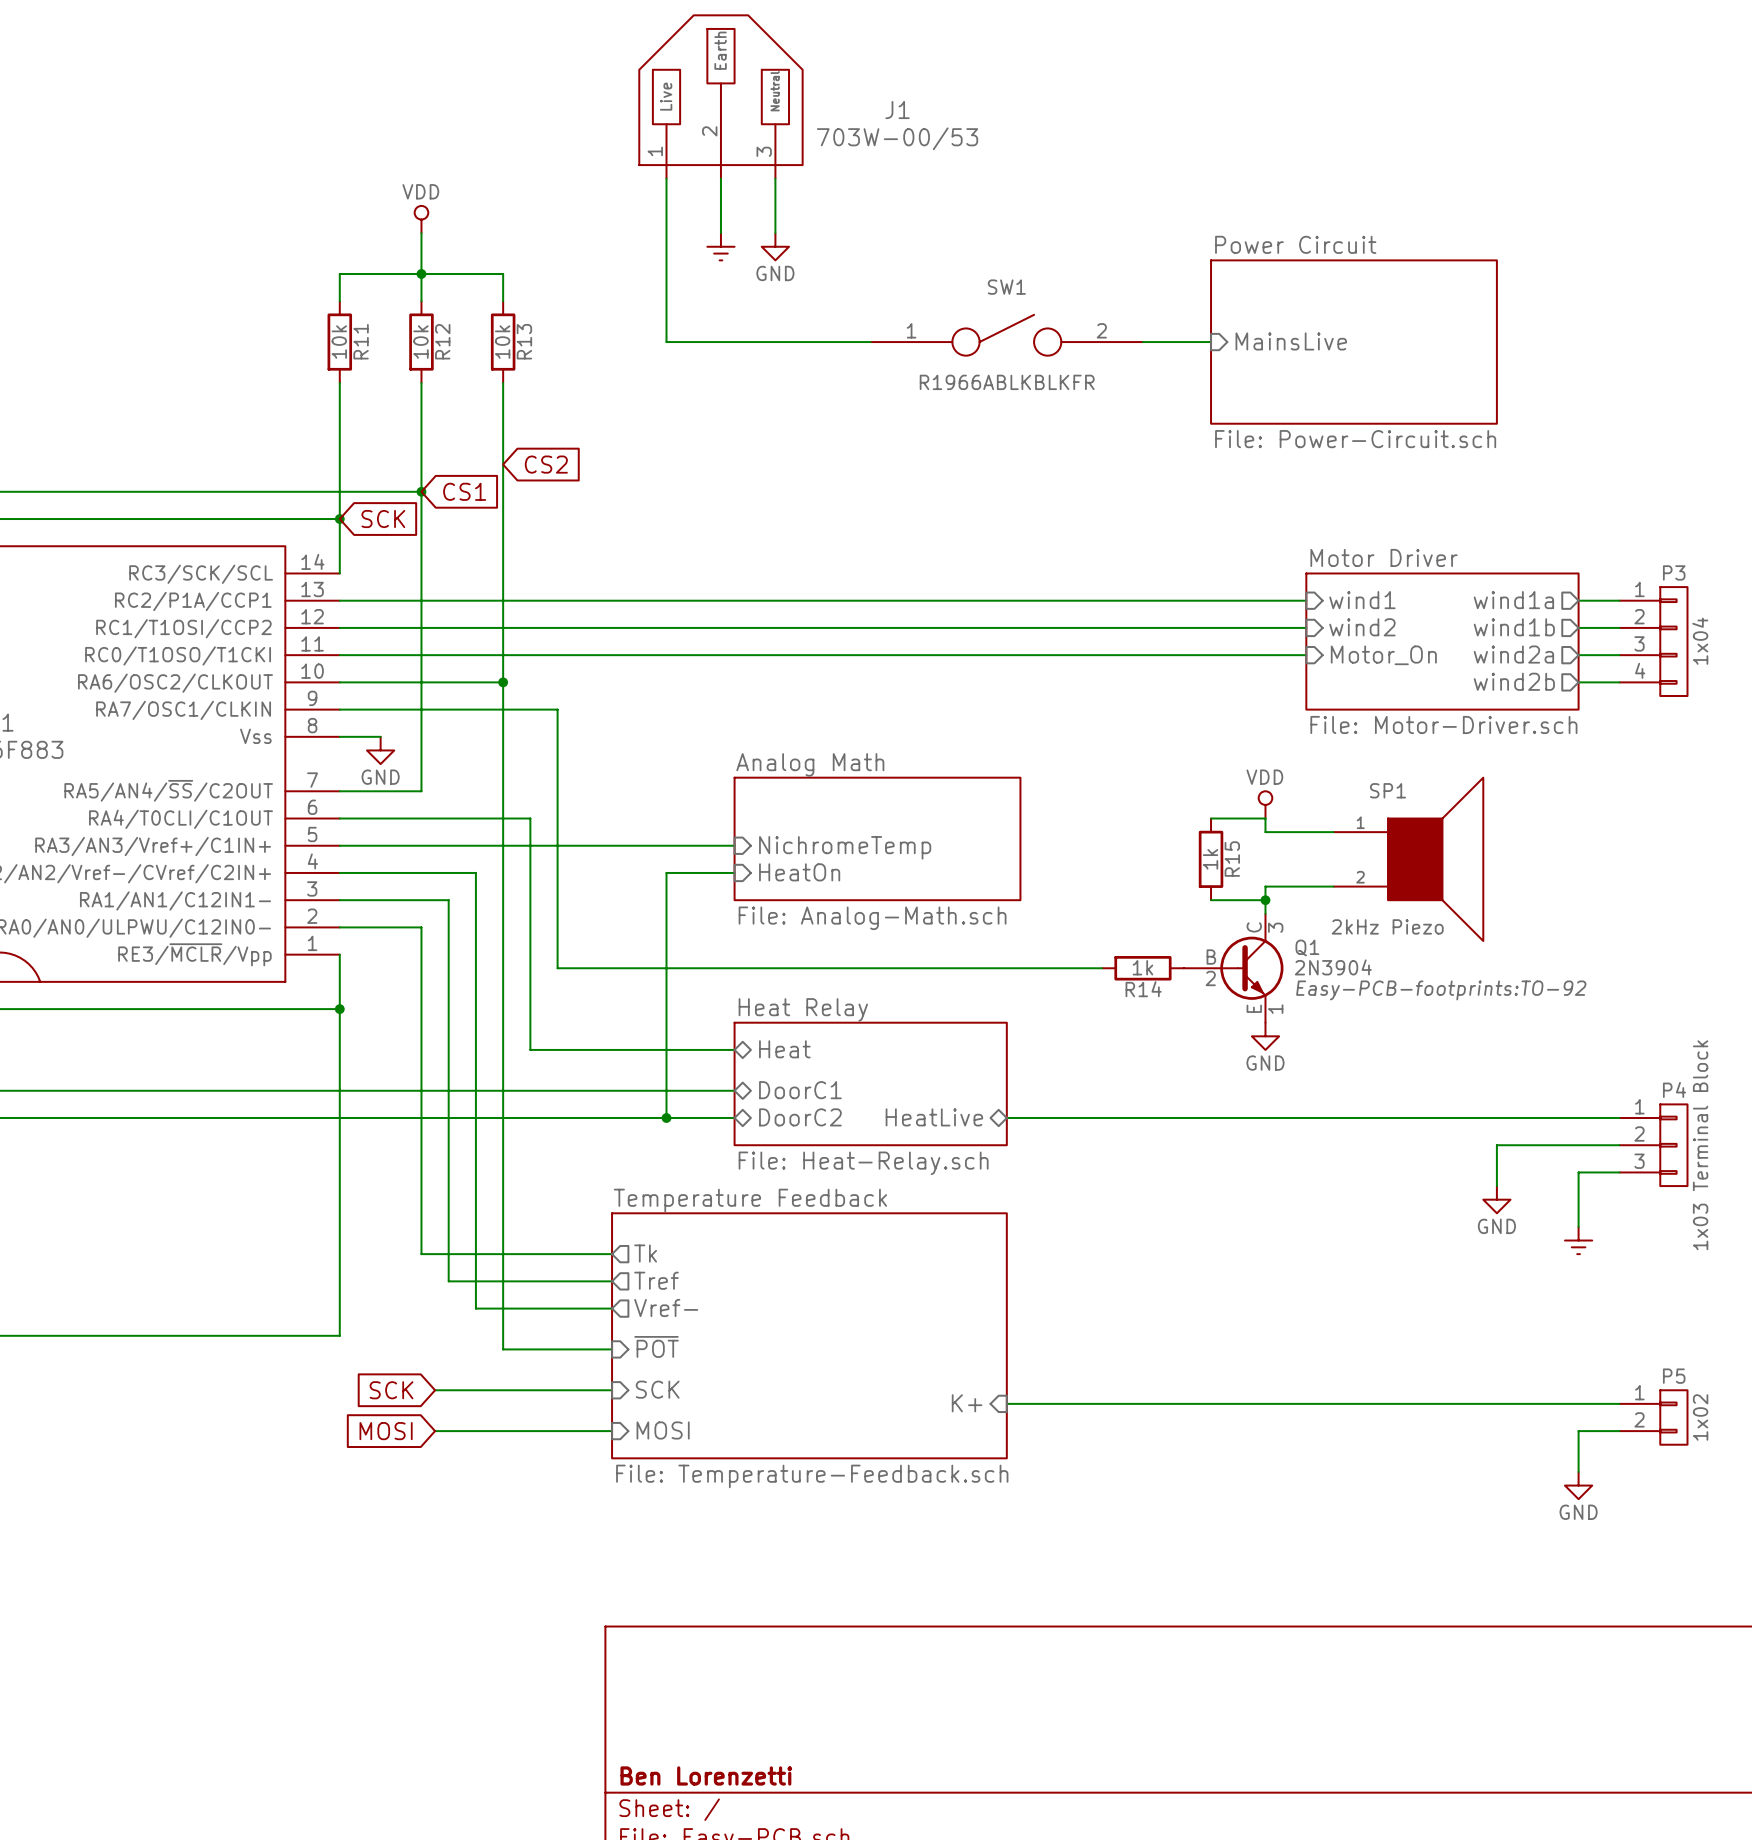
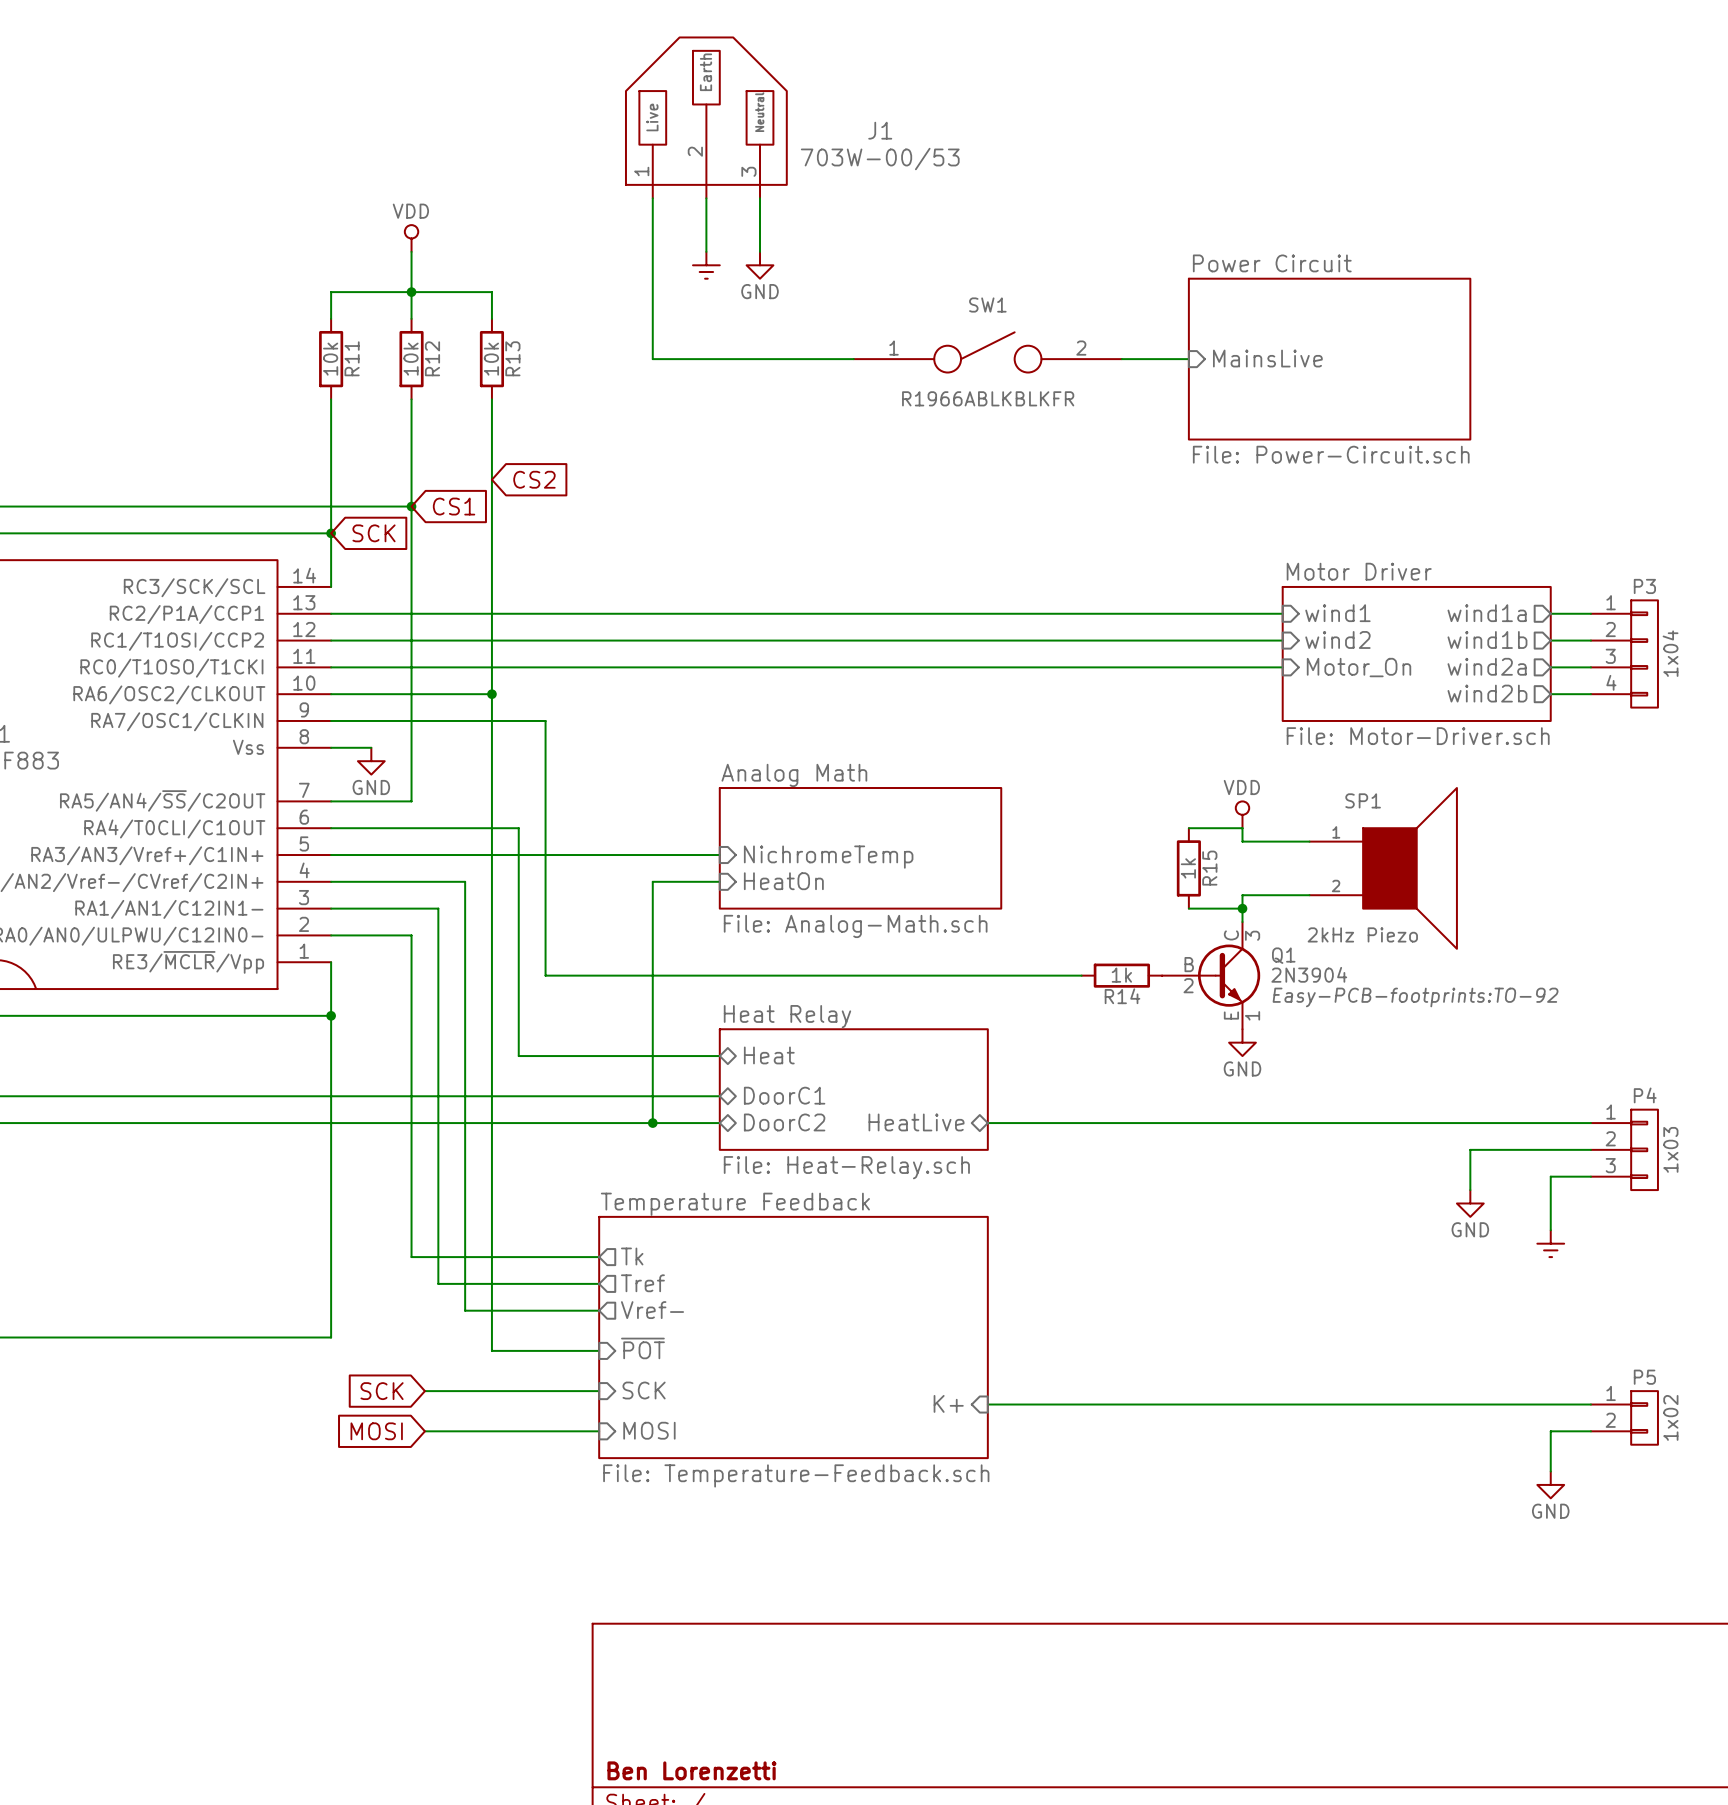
P4 value: 1x03 Terminal Block (1700, 1145) -> 1x03 (1670, 1149)

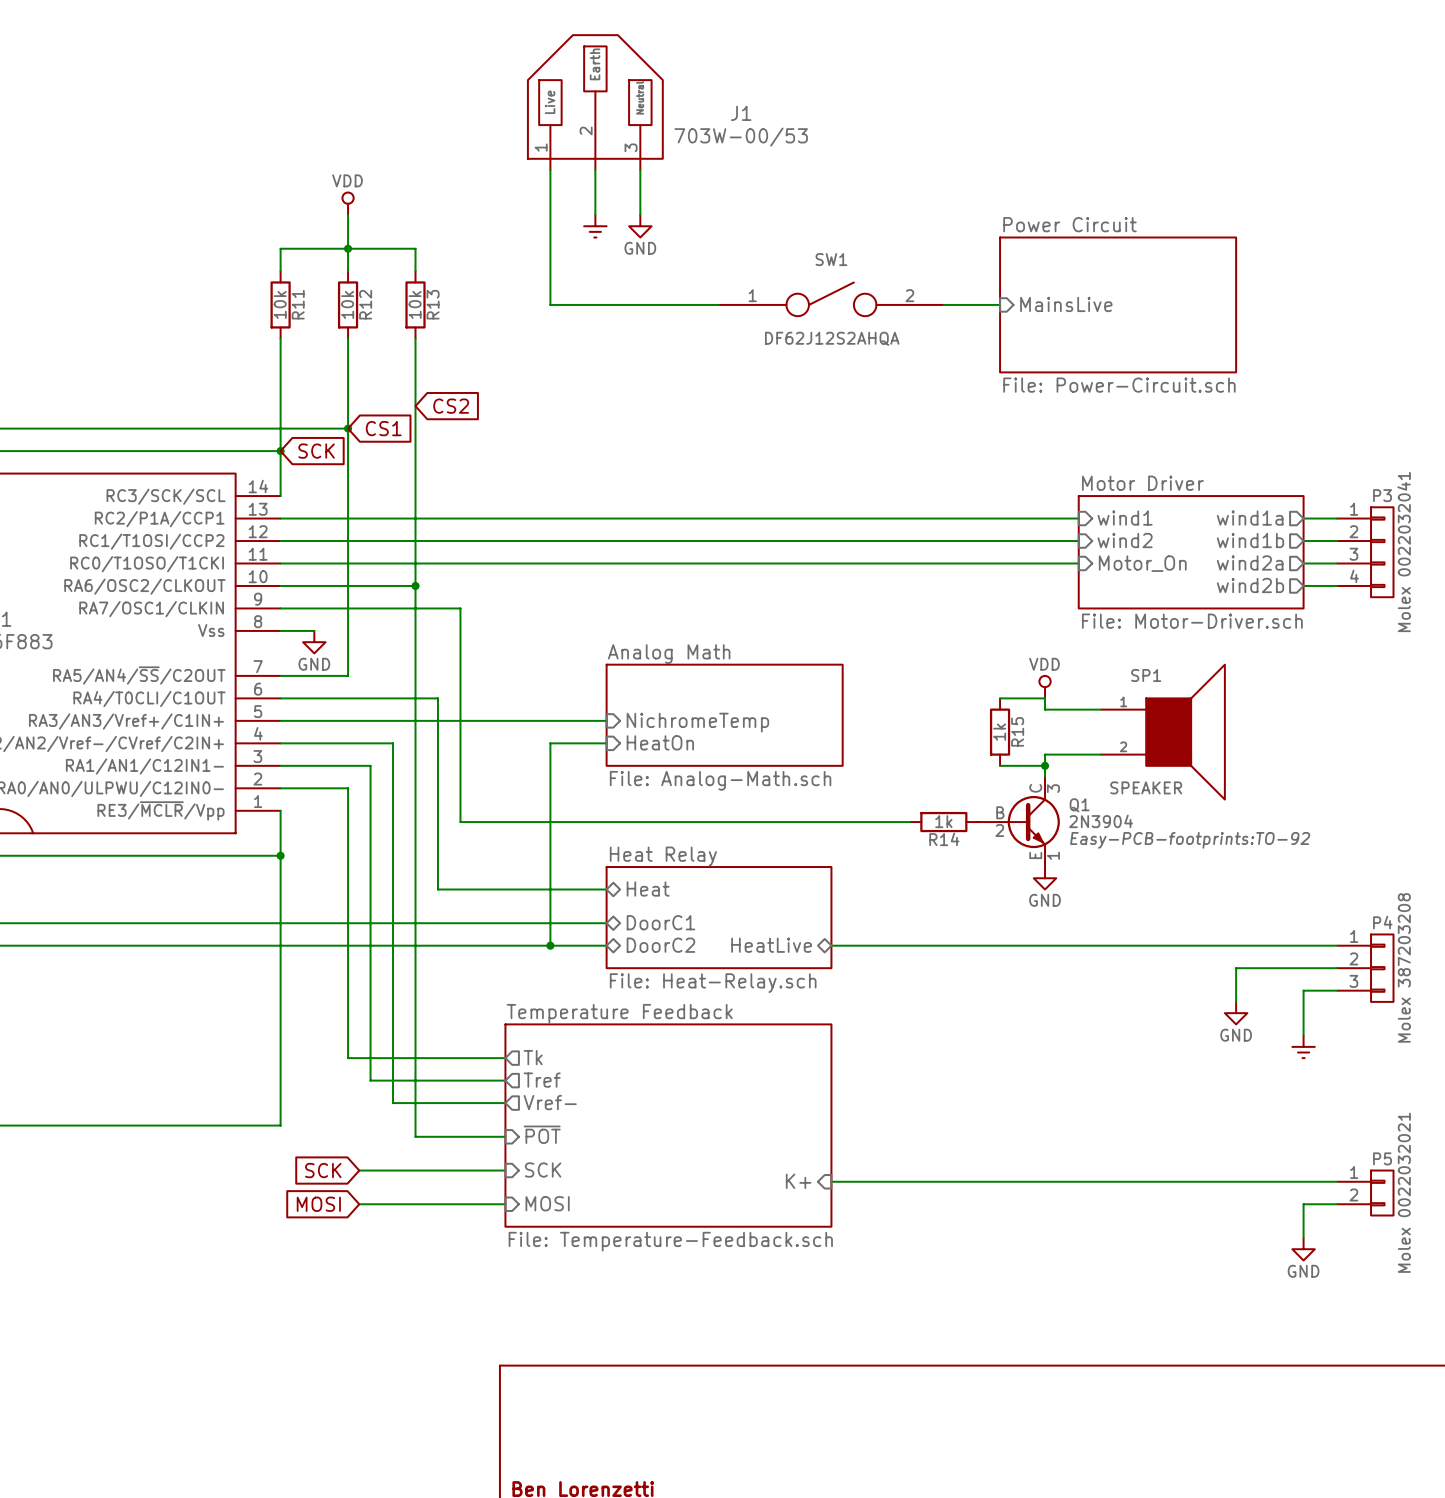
SW1 value: R1966ABLKBLKFR (988, 398) -> DF62J12S2AHQA (832, 338)
P3 value: 1x04 (1670, 653) -> Molex 0022032041 (1404, 551)
SP1 value: 2kHz Piezo (1362, 934) -> SPEAKER (1146, 787)
P4 value: 1x03 (1670, 1149) -> Molex 387203208 (1404, 967)
P5 value: 1x02 (1670, 1417) -> Molex 0022032021 (1404, 1192)

